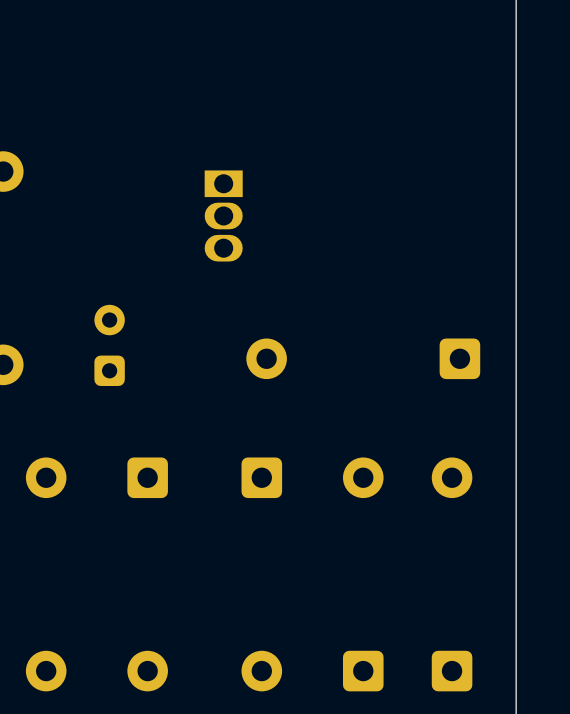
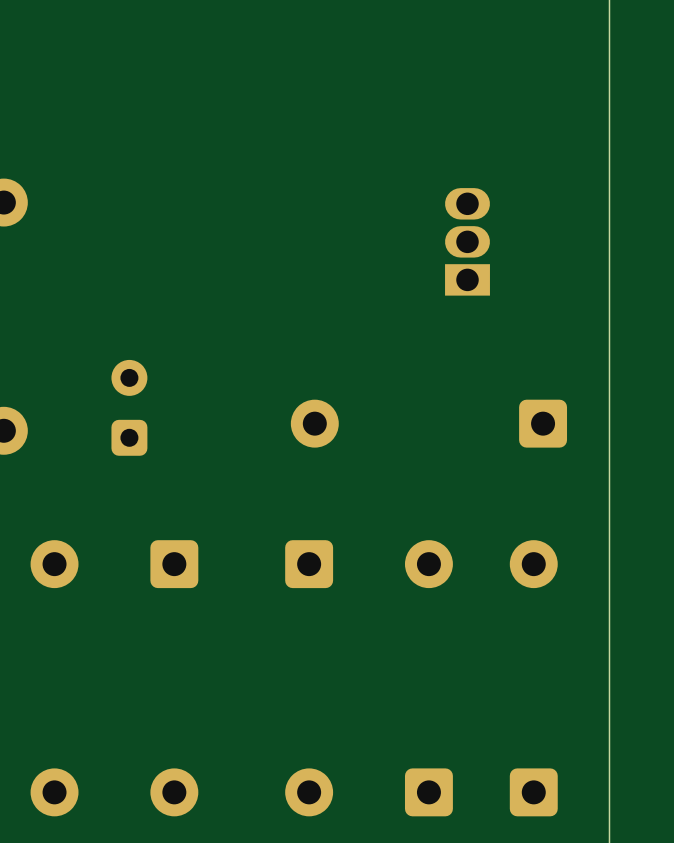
part rotation: 0° (223, 215) -> 180° (467, 241)
part position: (223, 215) -> (467, 241)

